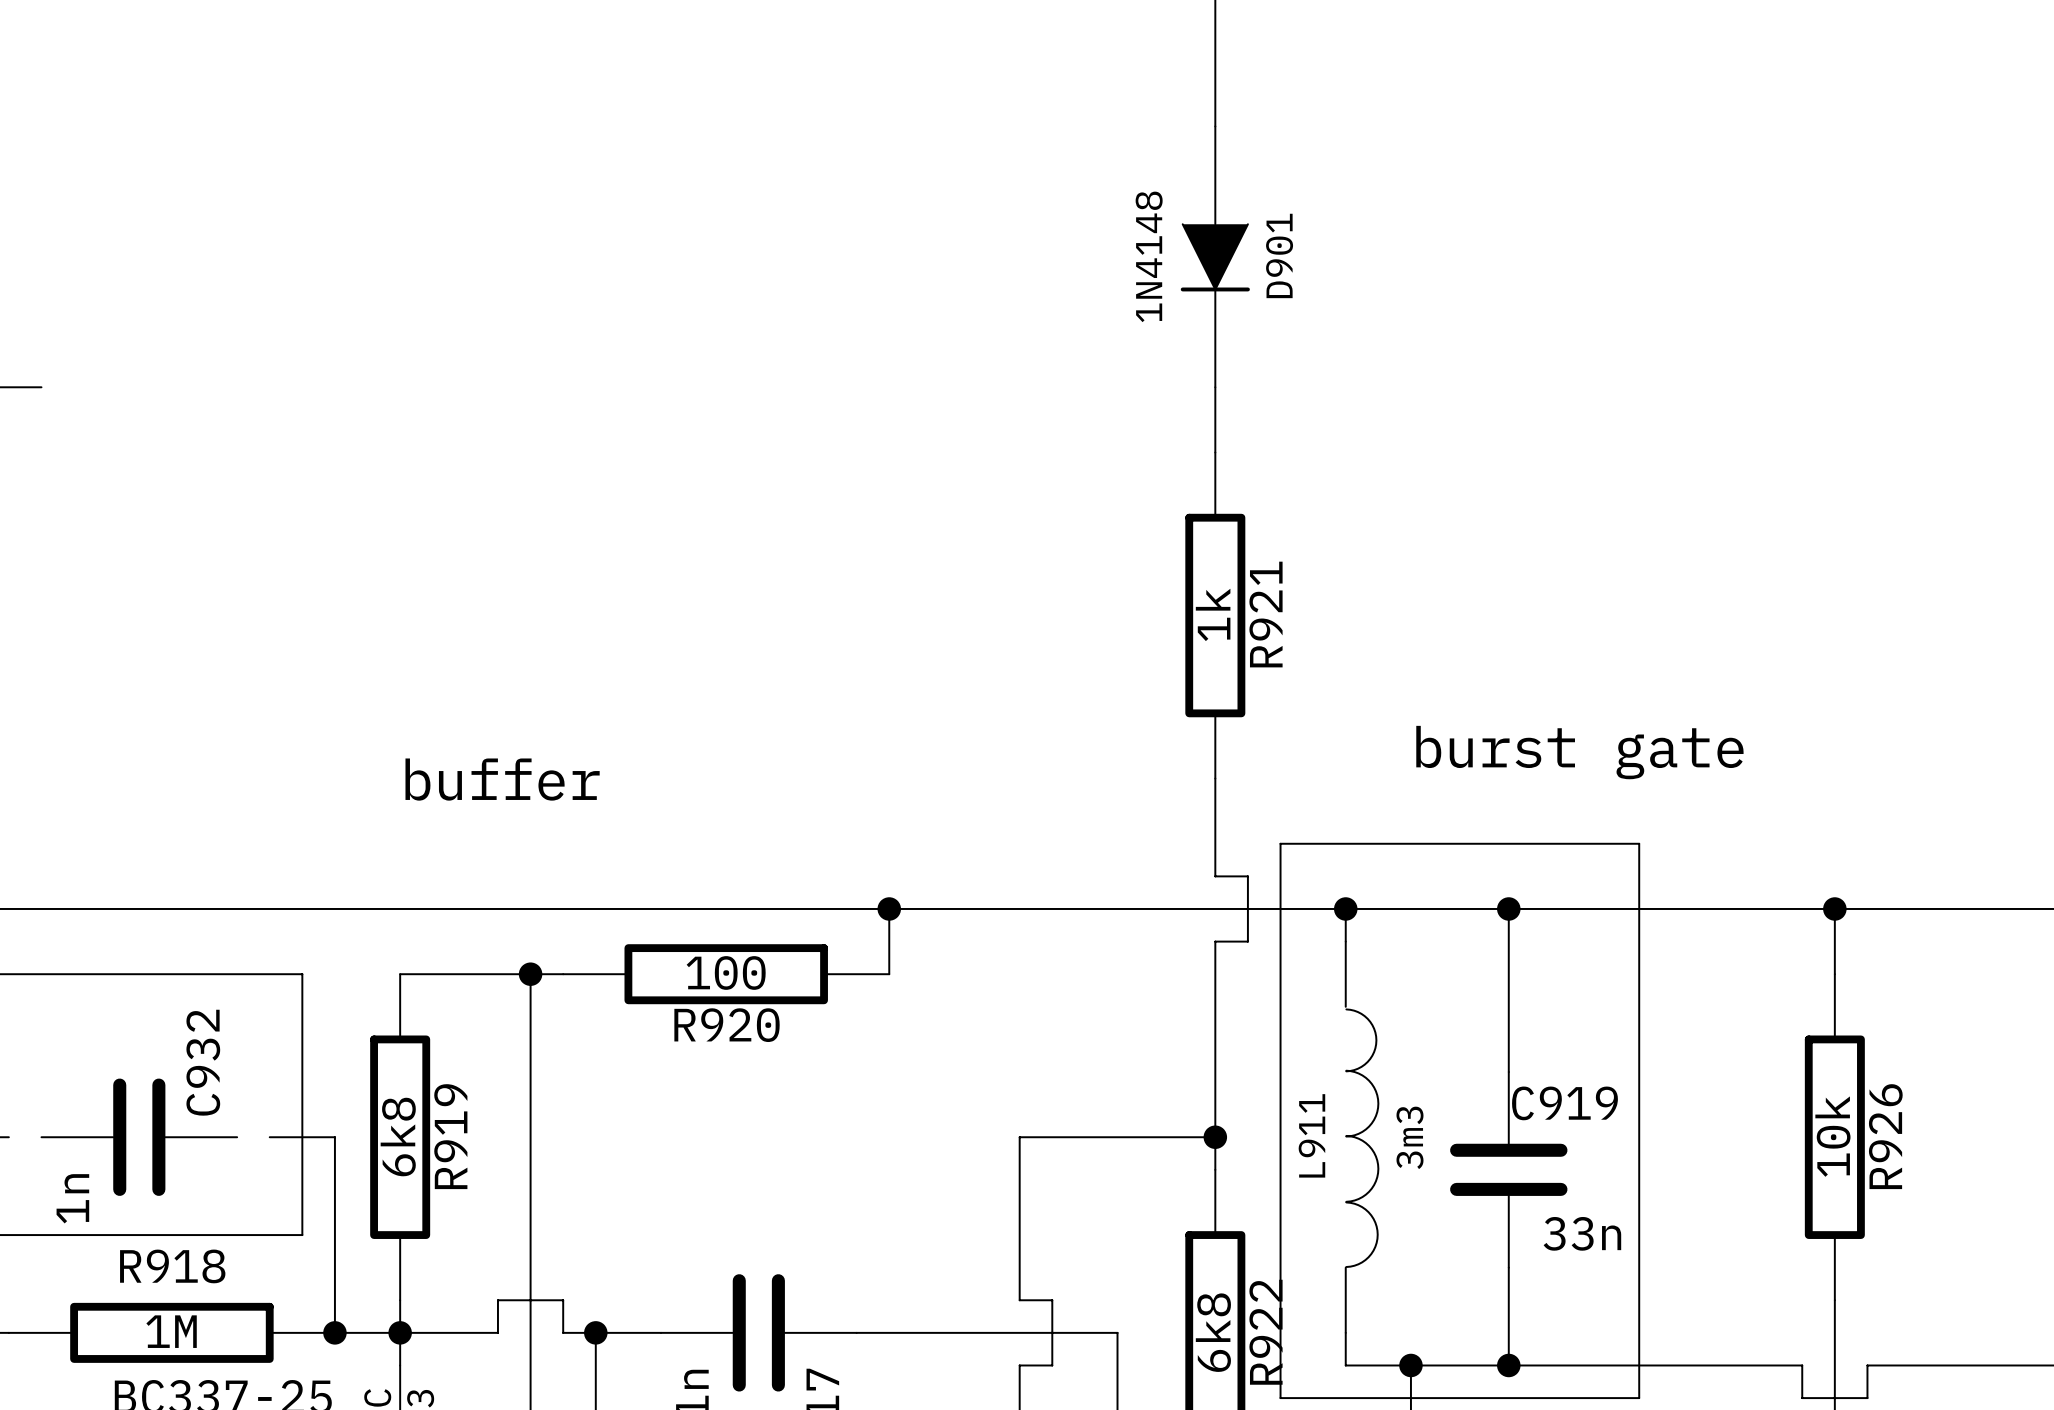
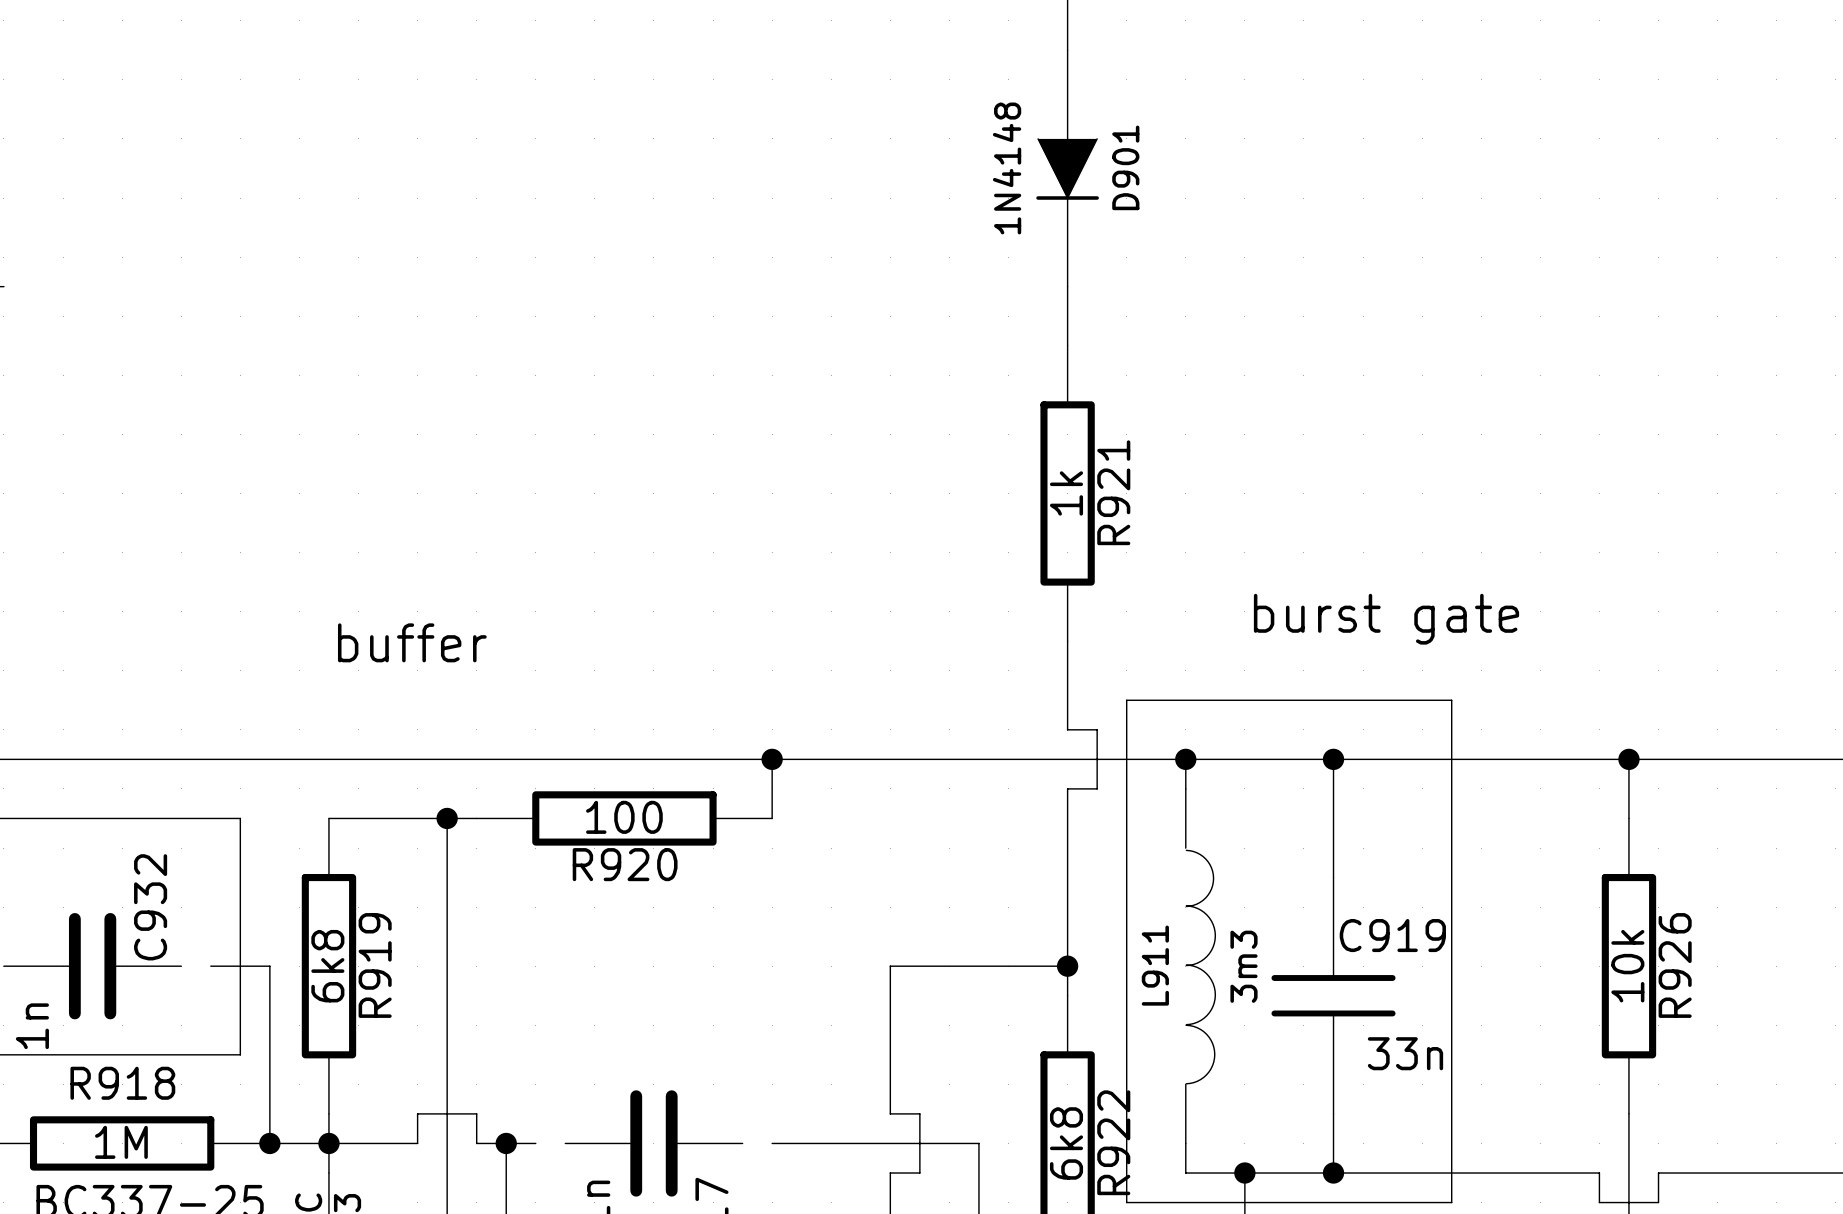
C919 symbol: [1450, 1072, 1568, 1268] -> [1271, 877, 1396, 1114]
wire: (628, 1332) (661, 1332) -> none
wire: (856, 1332) (889, 1332) -> none

